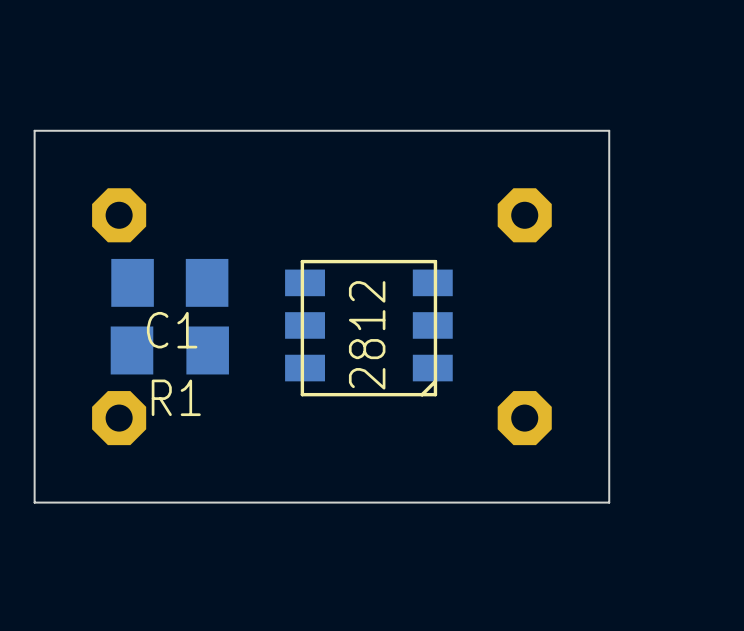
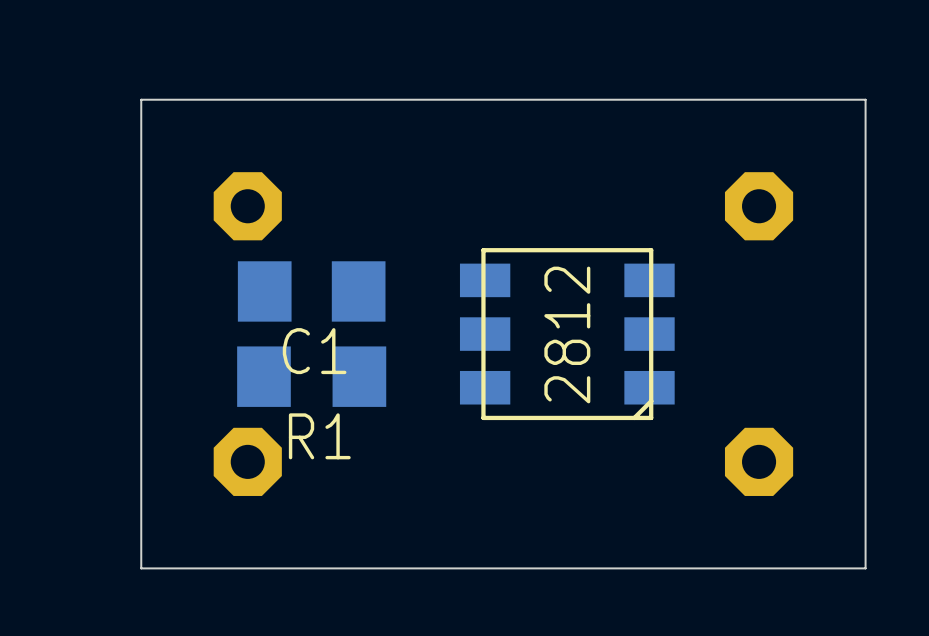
part footprint: [285, 259, 453, 397] -> [459, 248, 675, 421]

